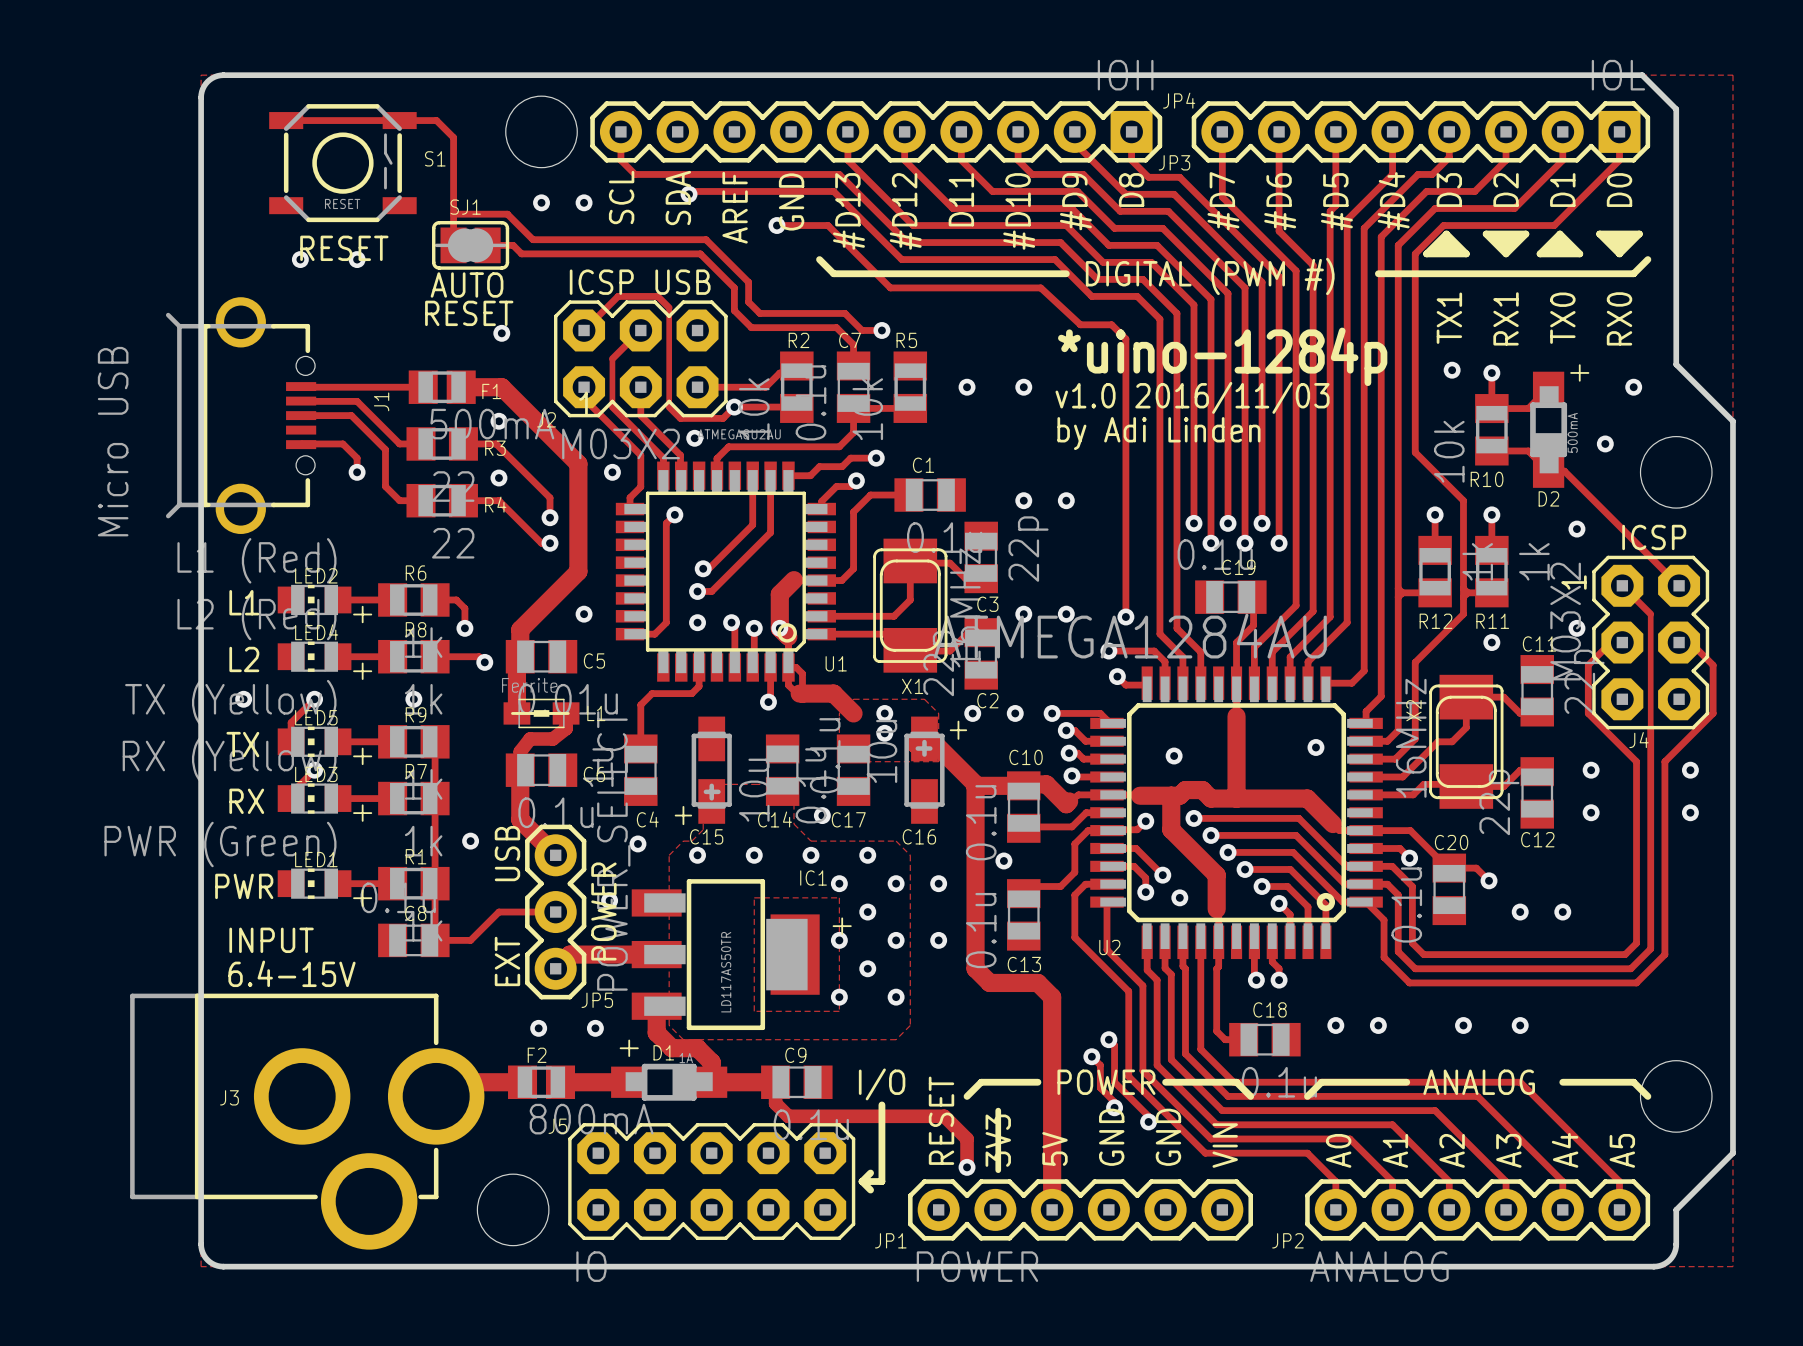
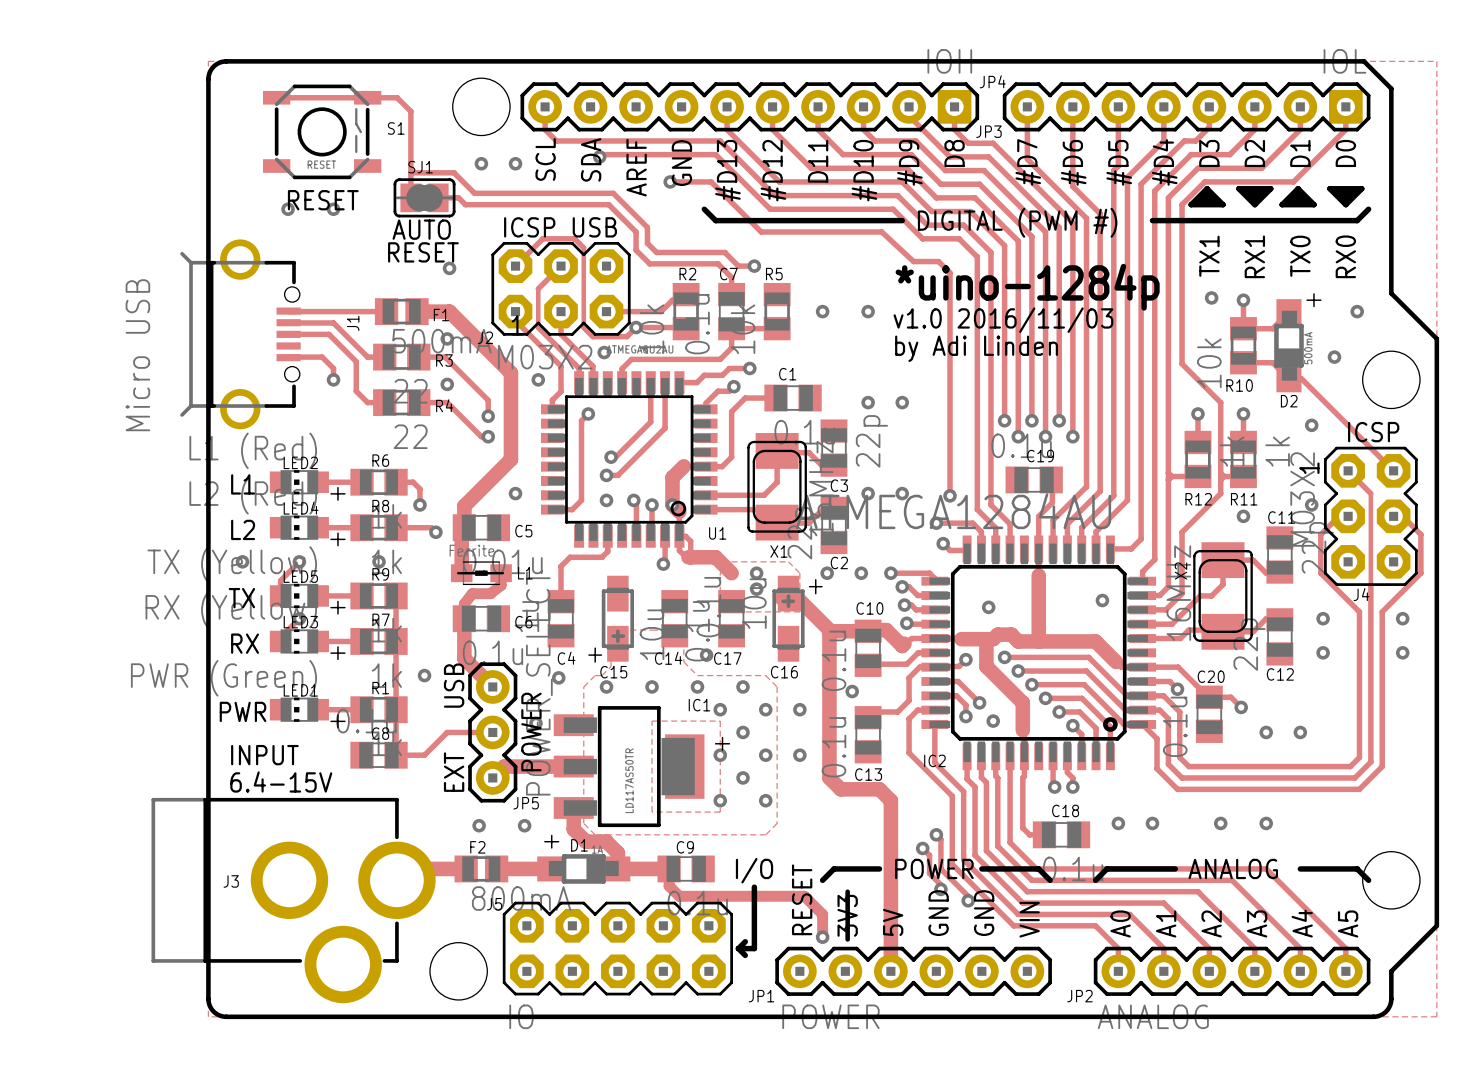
U2 name: U2 (1109, 947) -> IC2 (934, 760)

